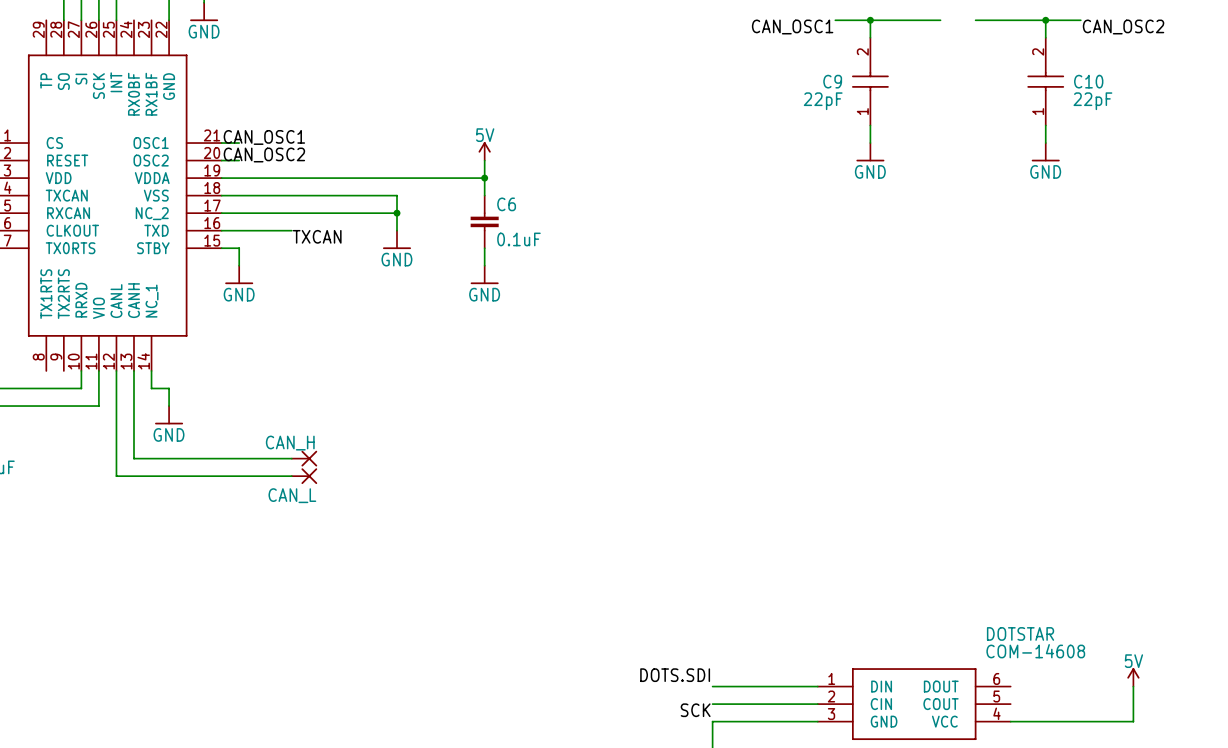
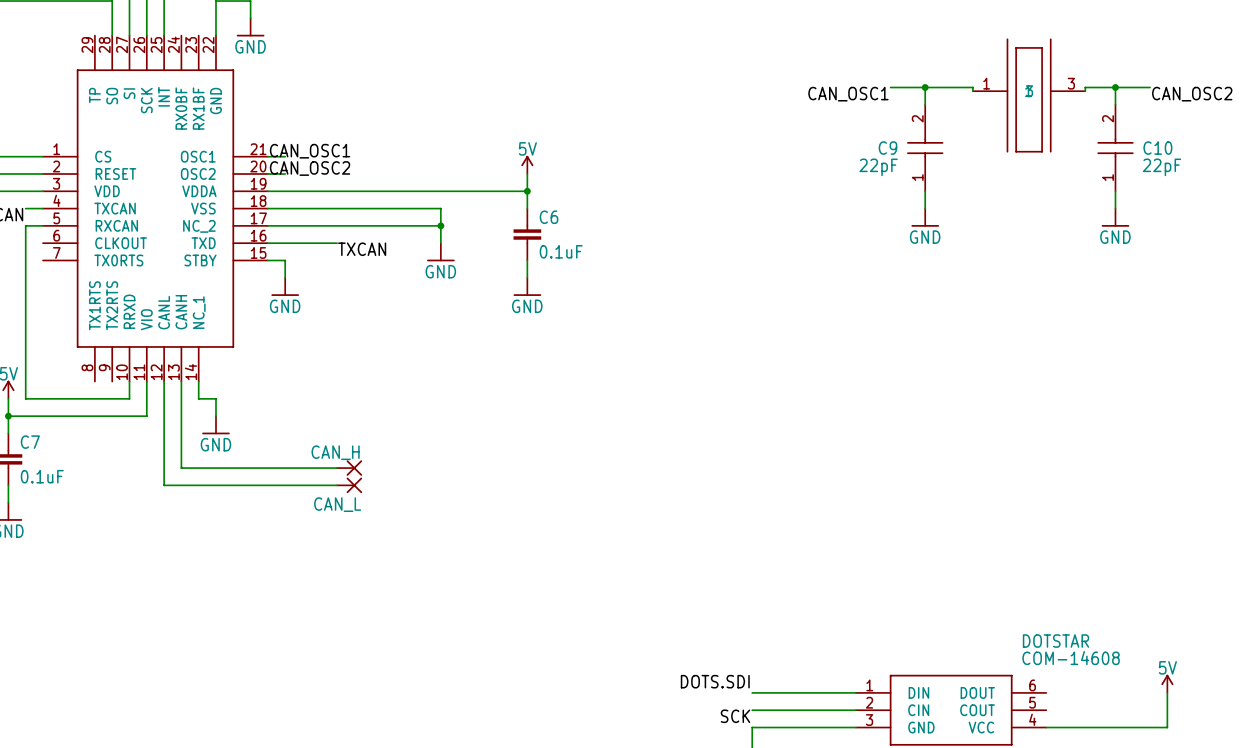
wire: (835, 20) (940, 20) -> none
wire: (870, 20) (870, 37) -> (925, 87) (925, 104)
junction: (870, 20) -> none
wire: (975, 20) (1080, 20) -> none
wire: (1045, 20) (1045, 37) -> (1115, 87) (1115, 104)
junction: (1045, 20) -> none
label position: CAN_OSC1 (792, 27) -> CAN_OSC1 (848, 94)
label position: CAN_OSC2 (1123, 27) -> CAN_OSC2 (1192, 94)
wire: none -> (890, 87) (972, 87) (972, 91)
junction: none -> (925, 87)
junction: none -> (1115, 87)
wire: none -> (1150, 87) (1085, 87) (1085, 91)
part: none -> (1029, 95)
C9 position: (870, 81) -> (925, 148)
C10 position: (1045, 81) -> (1115, 148)
wire: (870, 125) (870, 143) -> (925, 191) (925, 208)
wire: (1045, 125) (1045, 143) -> (1115, 191) (1115, 208)
power symbol position: GND (870, 152) -> GND (925, 217)
power symbol position: GND (1045, 152) -> GND (1115, 217)

